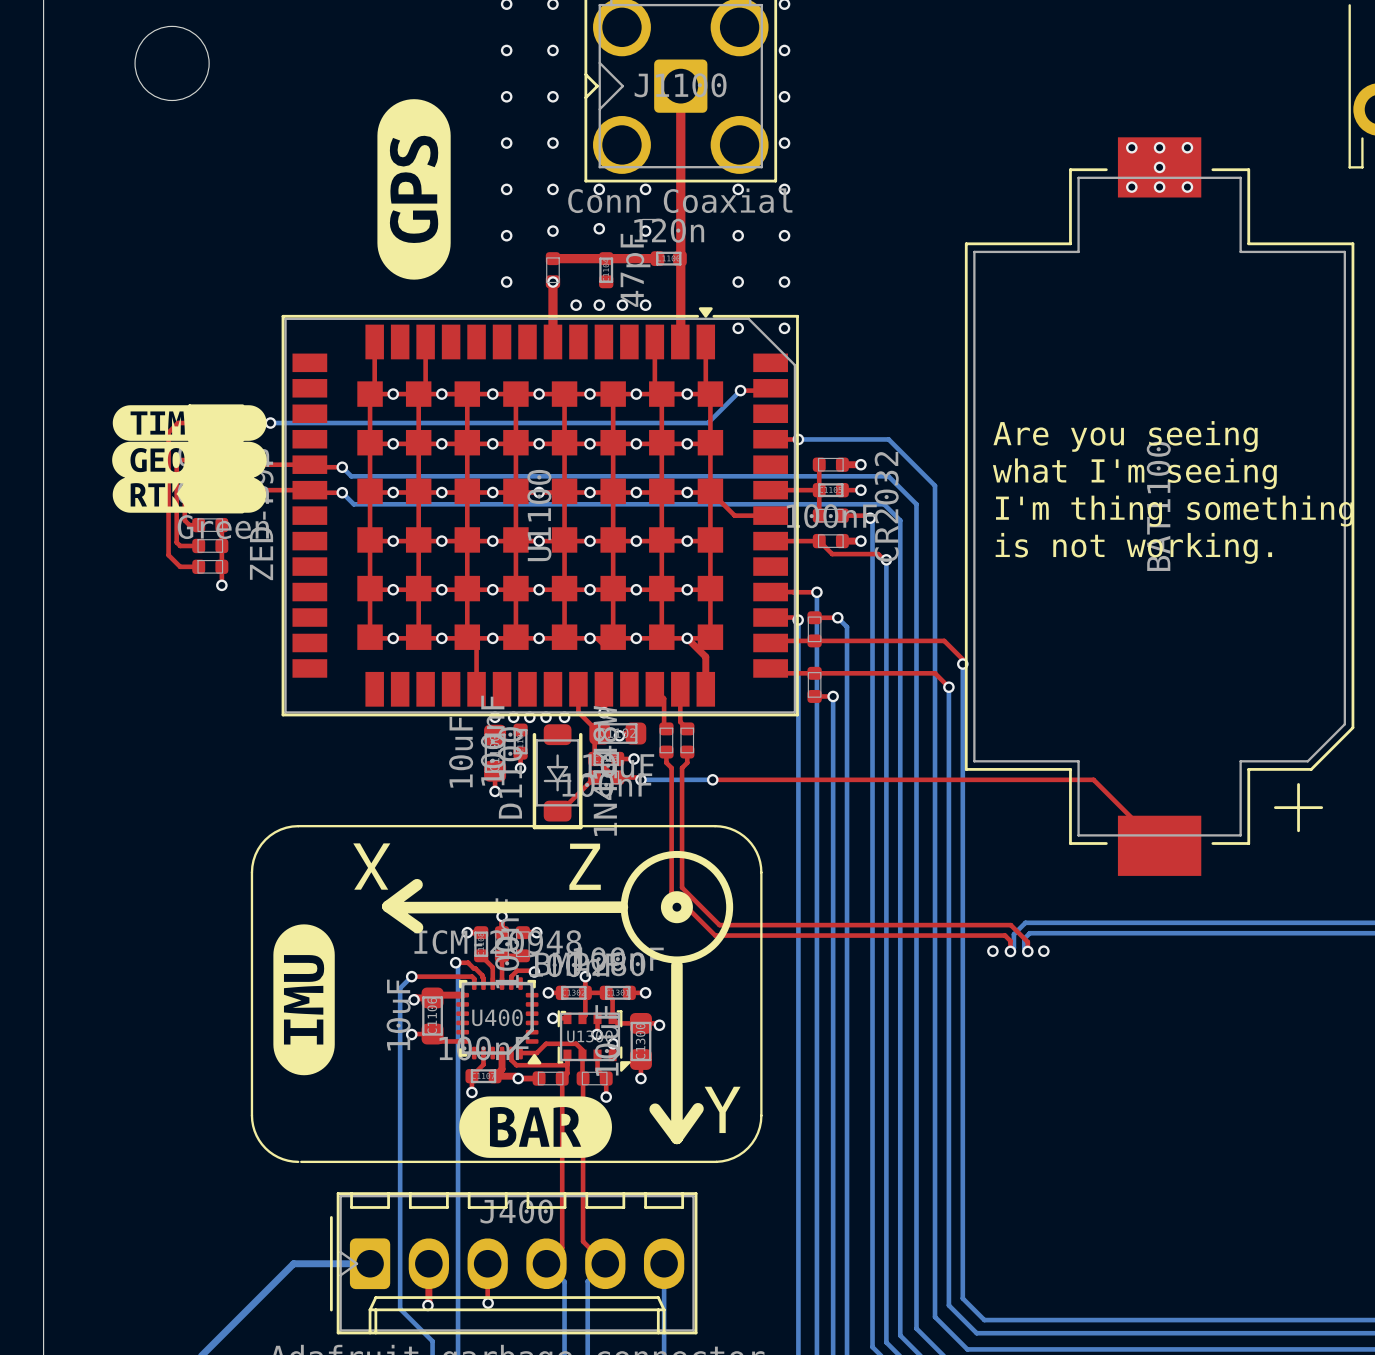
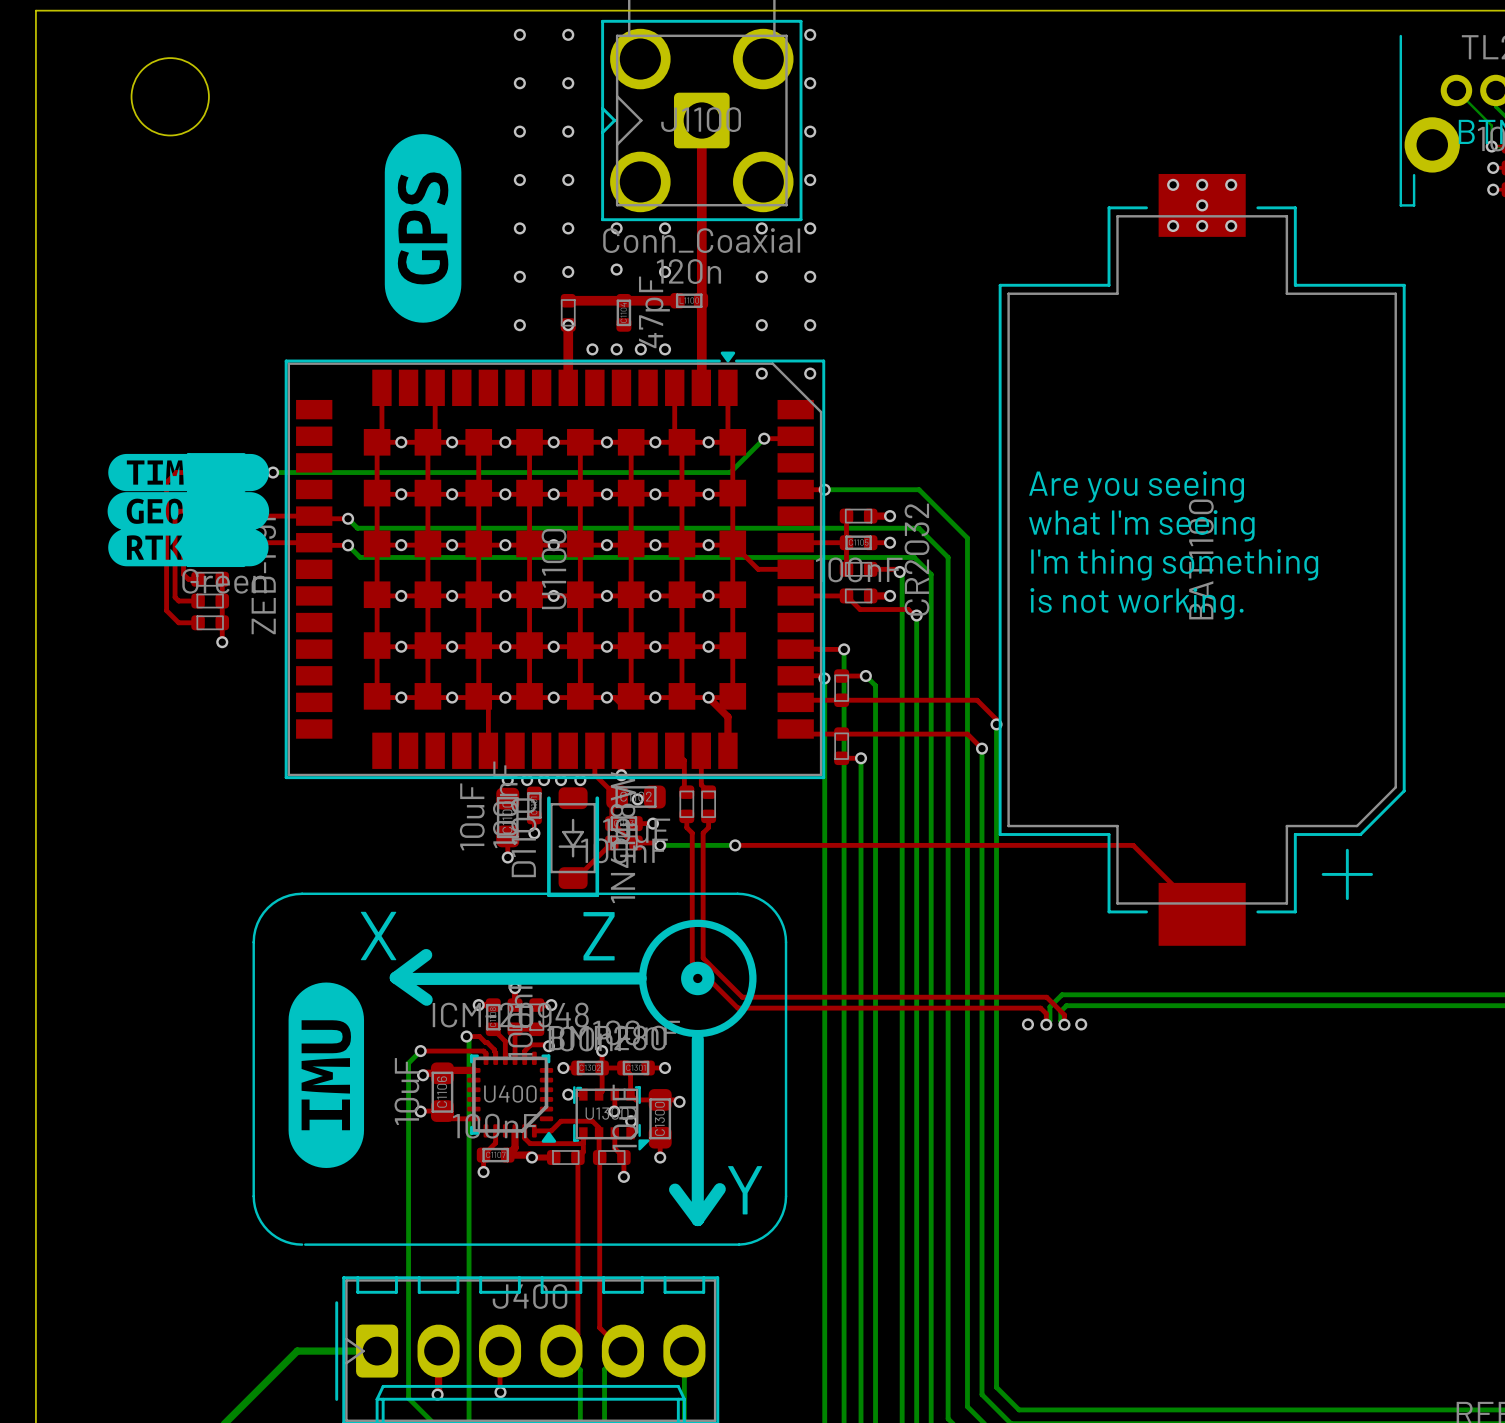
drawing shape: [273, 924, 335, 1076] -> [288, 982, 365, 1168]
drawing: [459, 1096, 612, 1158] -> none

